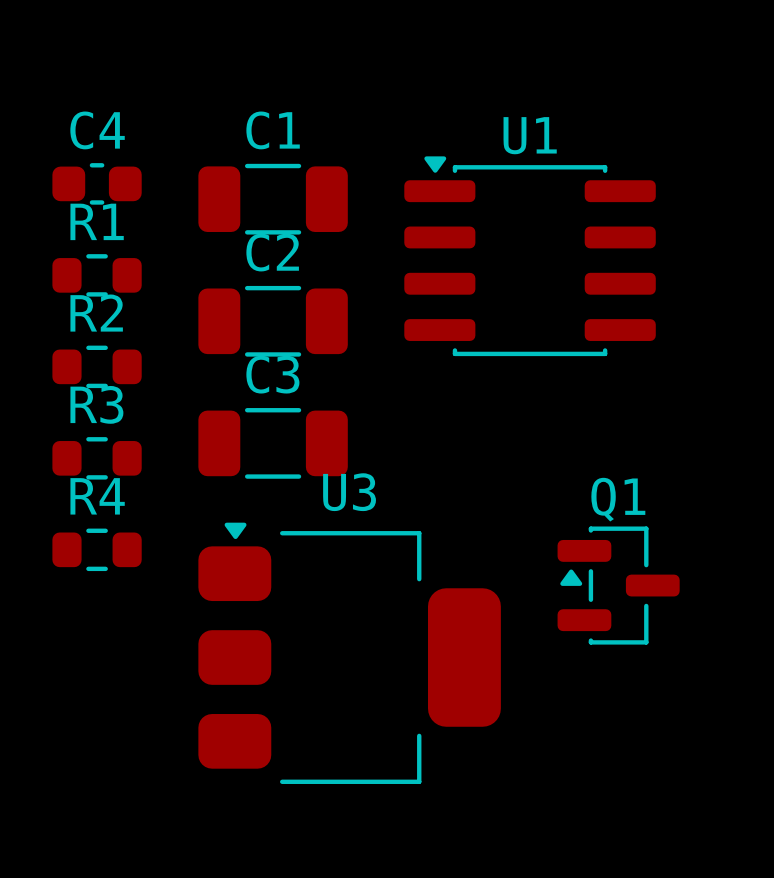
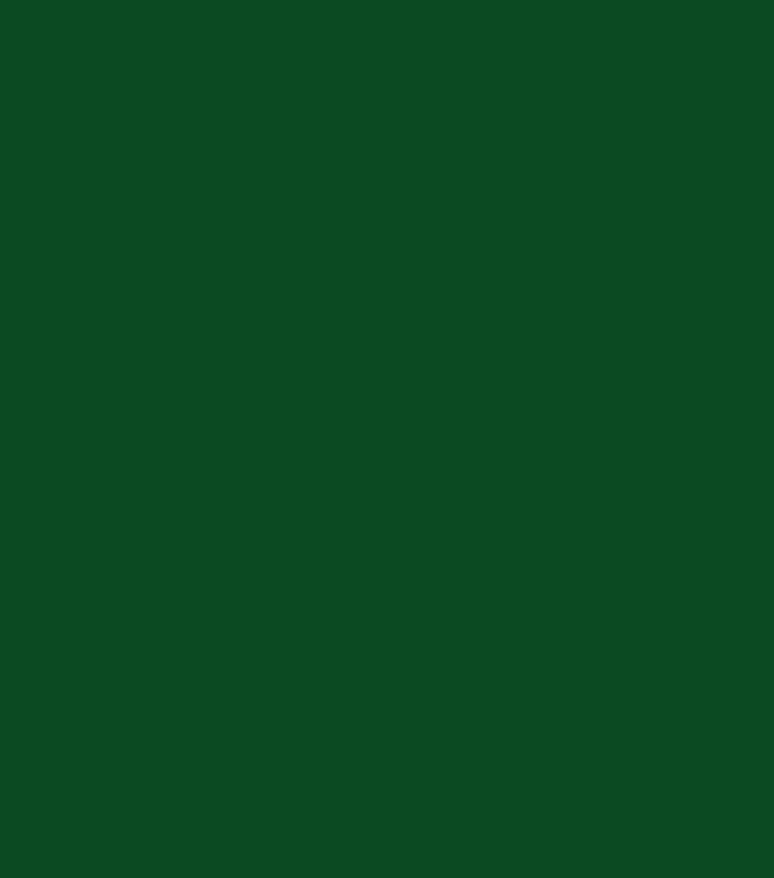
C4: (97, 183) -> none
C1: (273, 199) -> none
U1: (530, 256) -> none
R1: (97, 275) -> none
C2: (273, 321) -> none
R2: (97, 366) -> none
C3: (273, 443) -> none
R3: (97, 458) -> none
R4: (97, 549) -> none
Q1: (618, 585) -> none
U3: (349, 653) -> none

